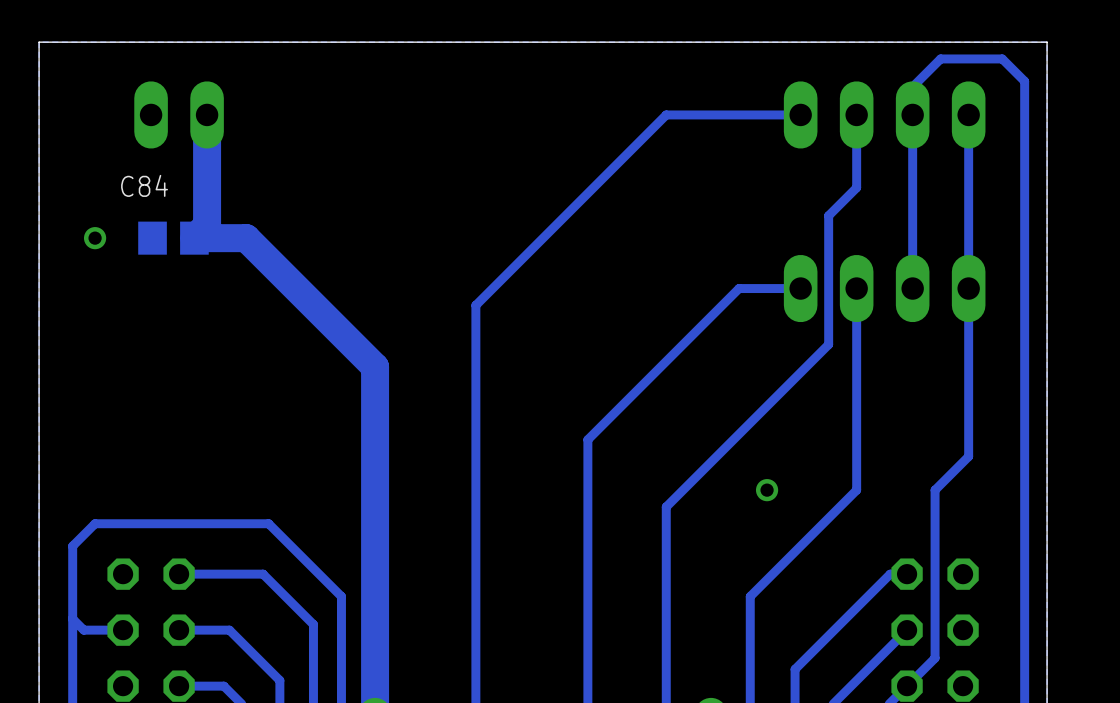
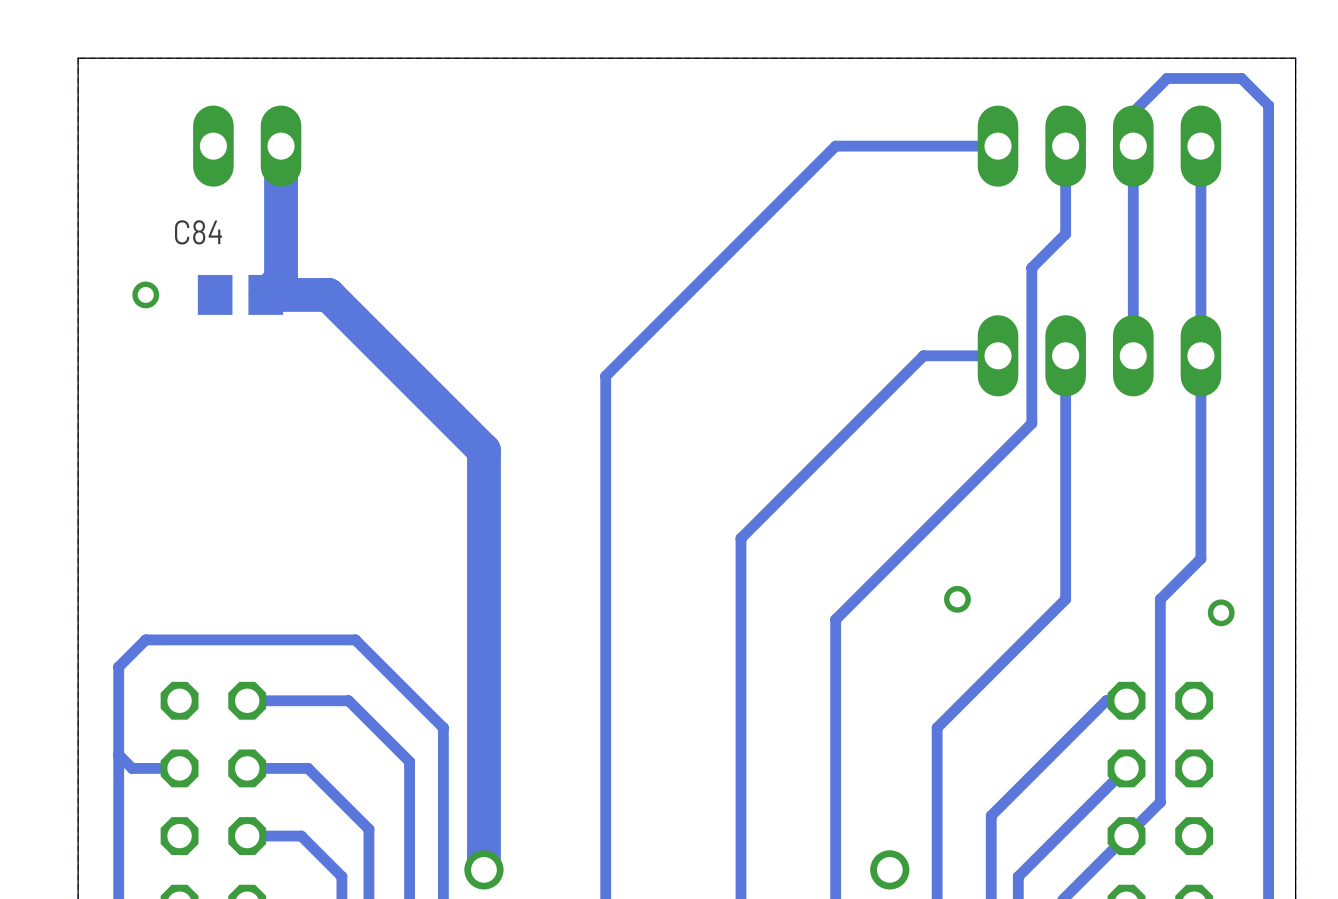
via: none -> (1221, 612)

